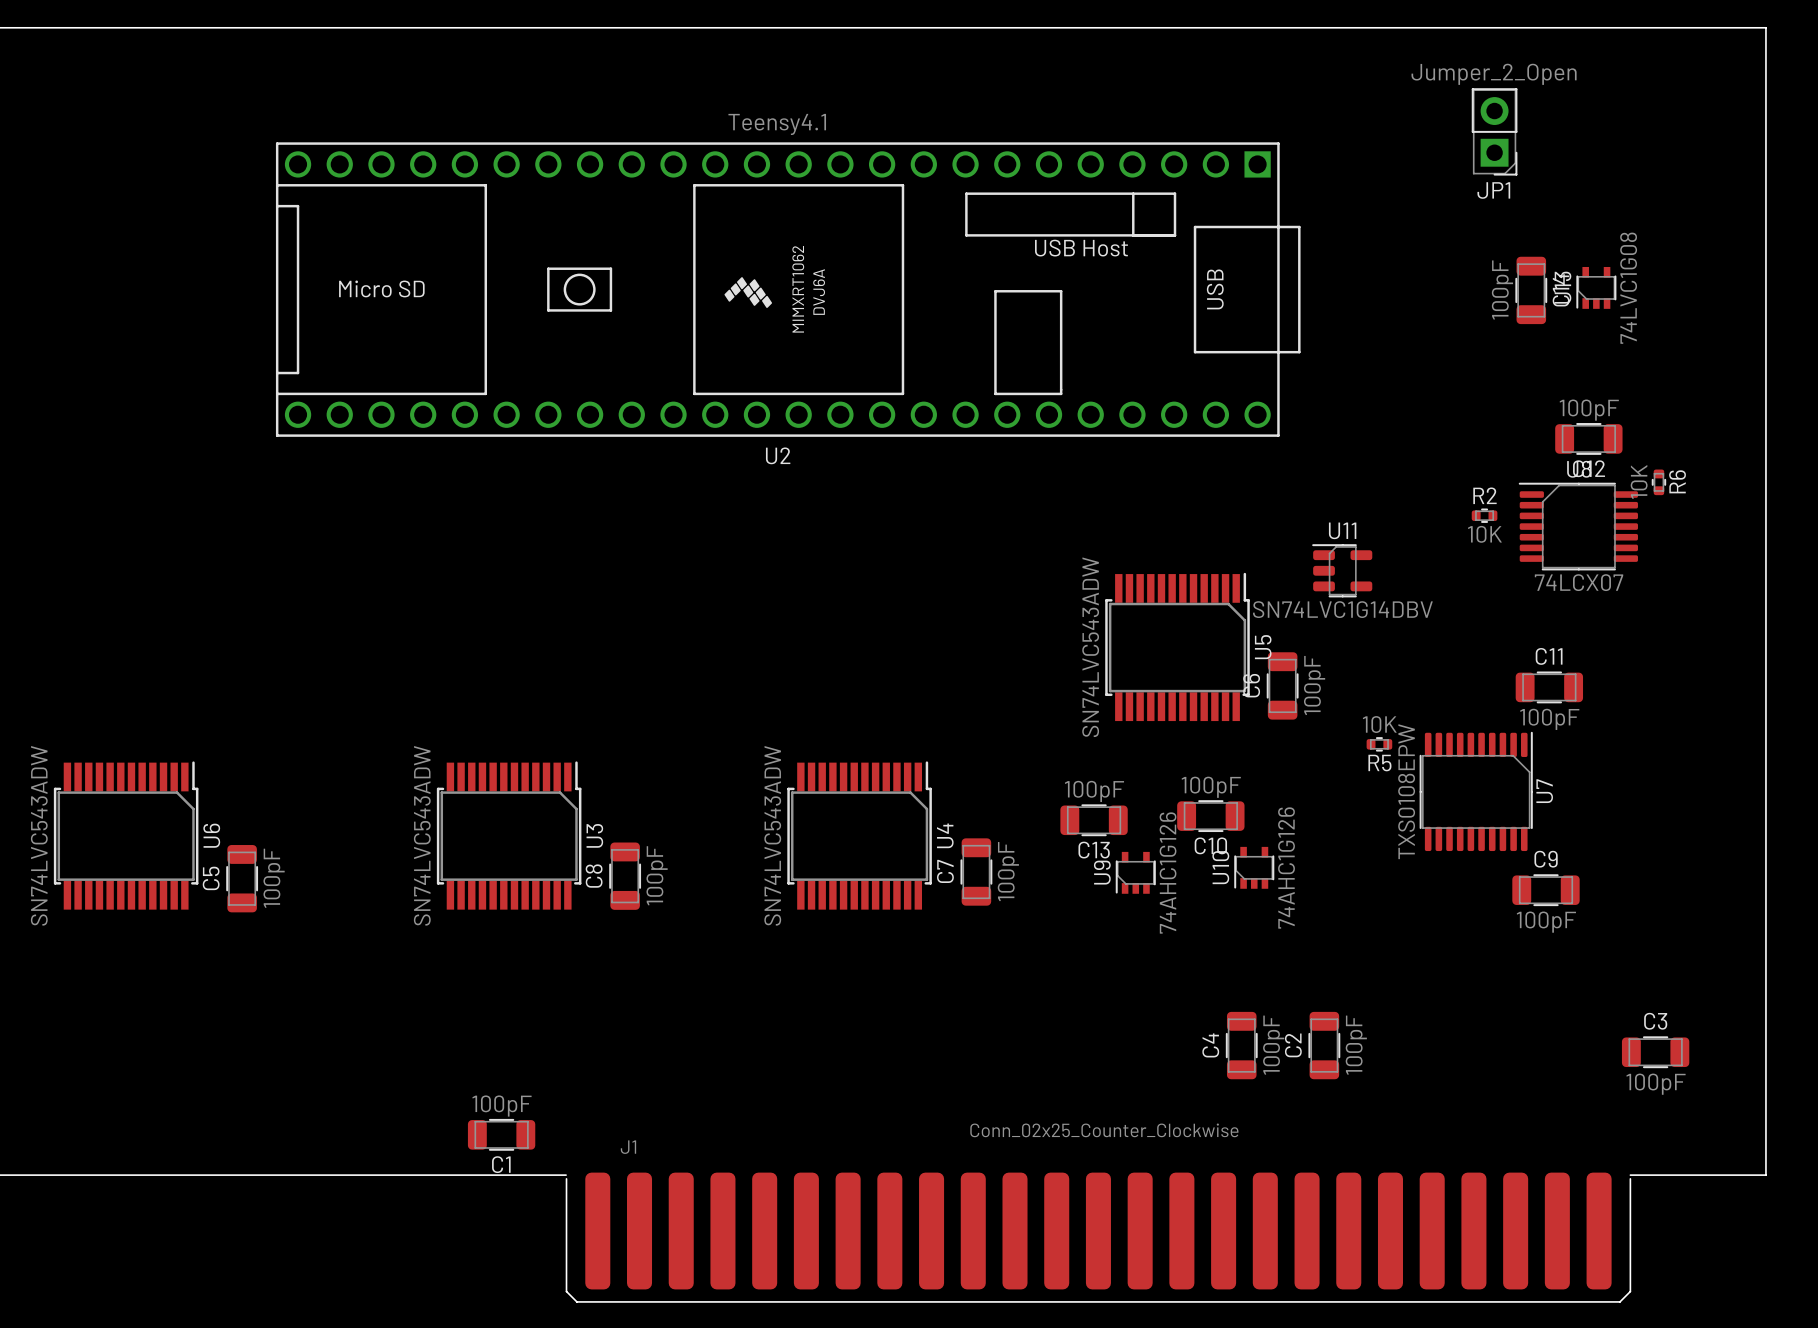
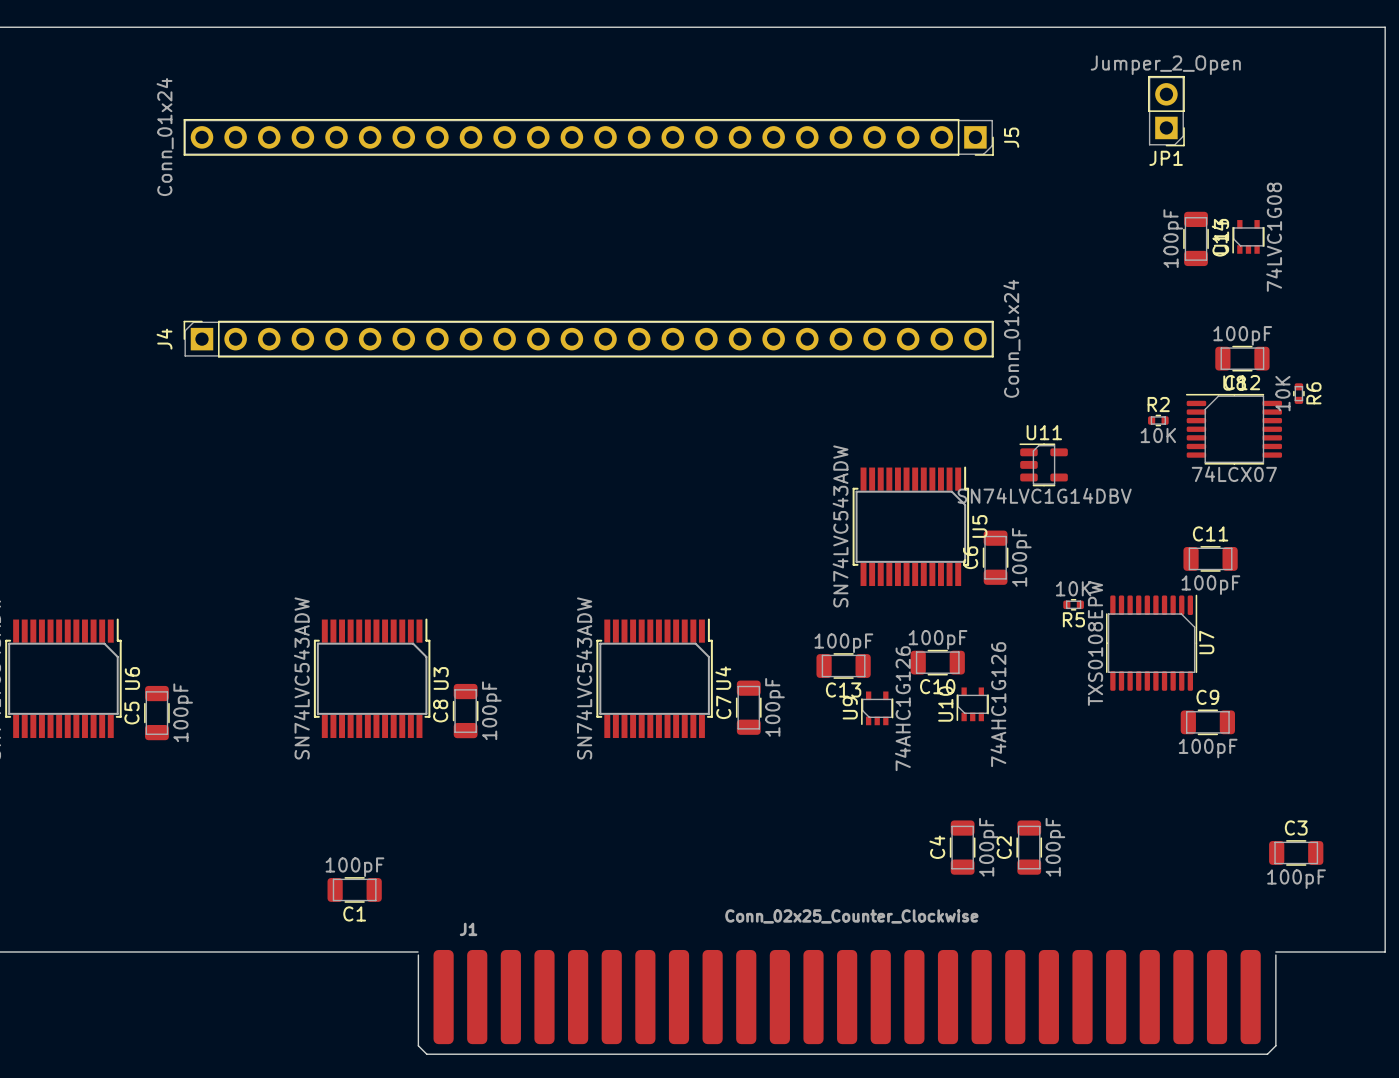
J5: none -> Conn_01x24 (588, 137)
U2: Teensy4.1 (788, 289) -> none
J4: none -> Conn_01x24 (588, 339)
C1 position: (501, 1134) -> (354, 889)

